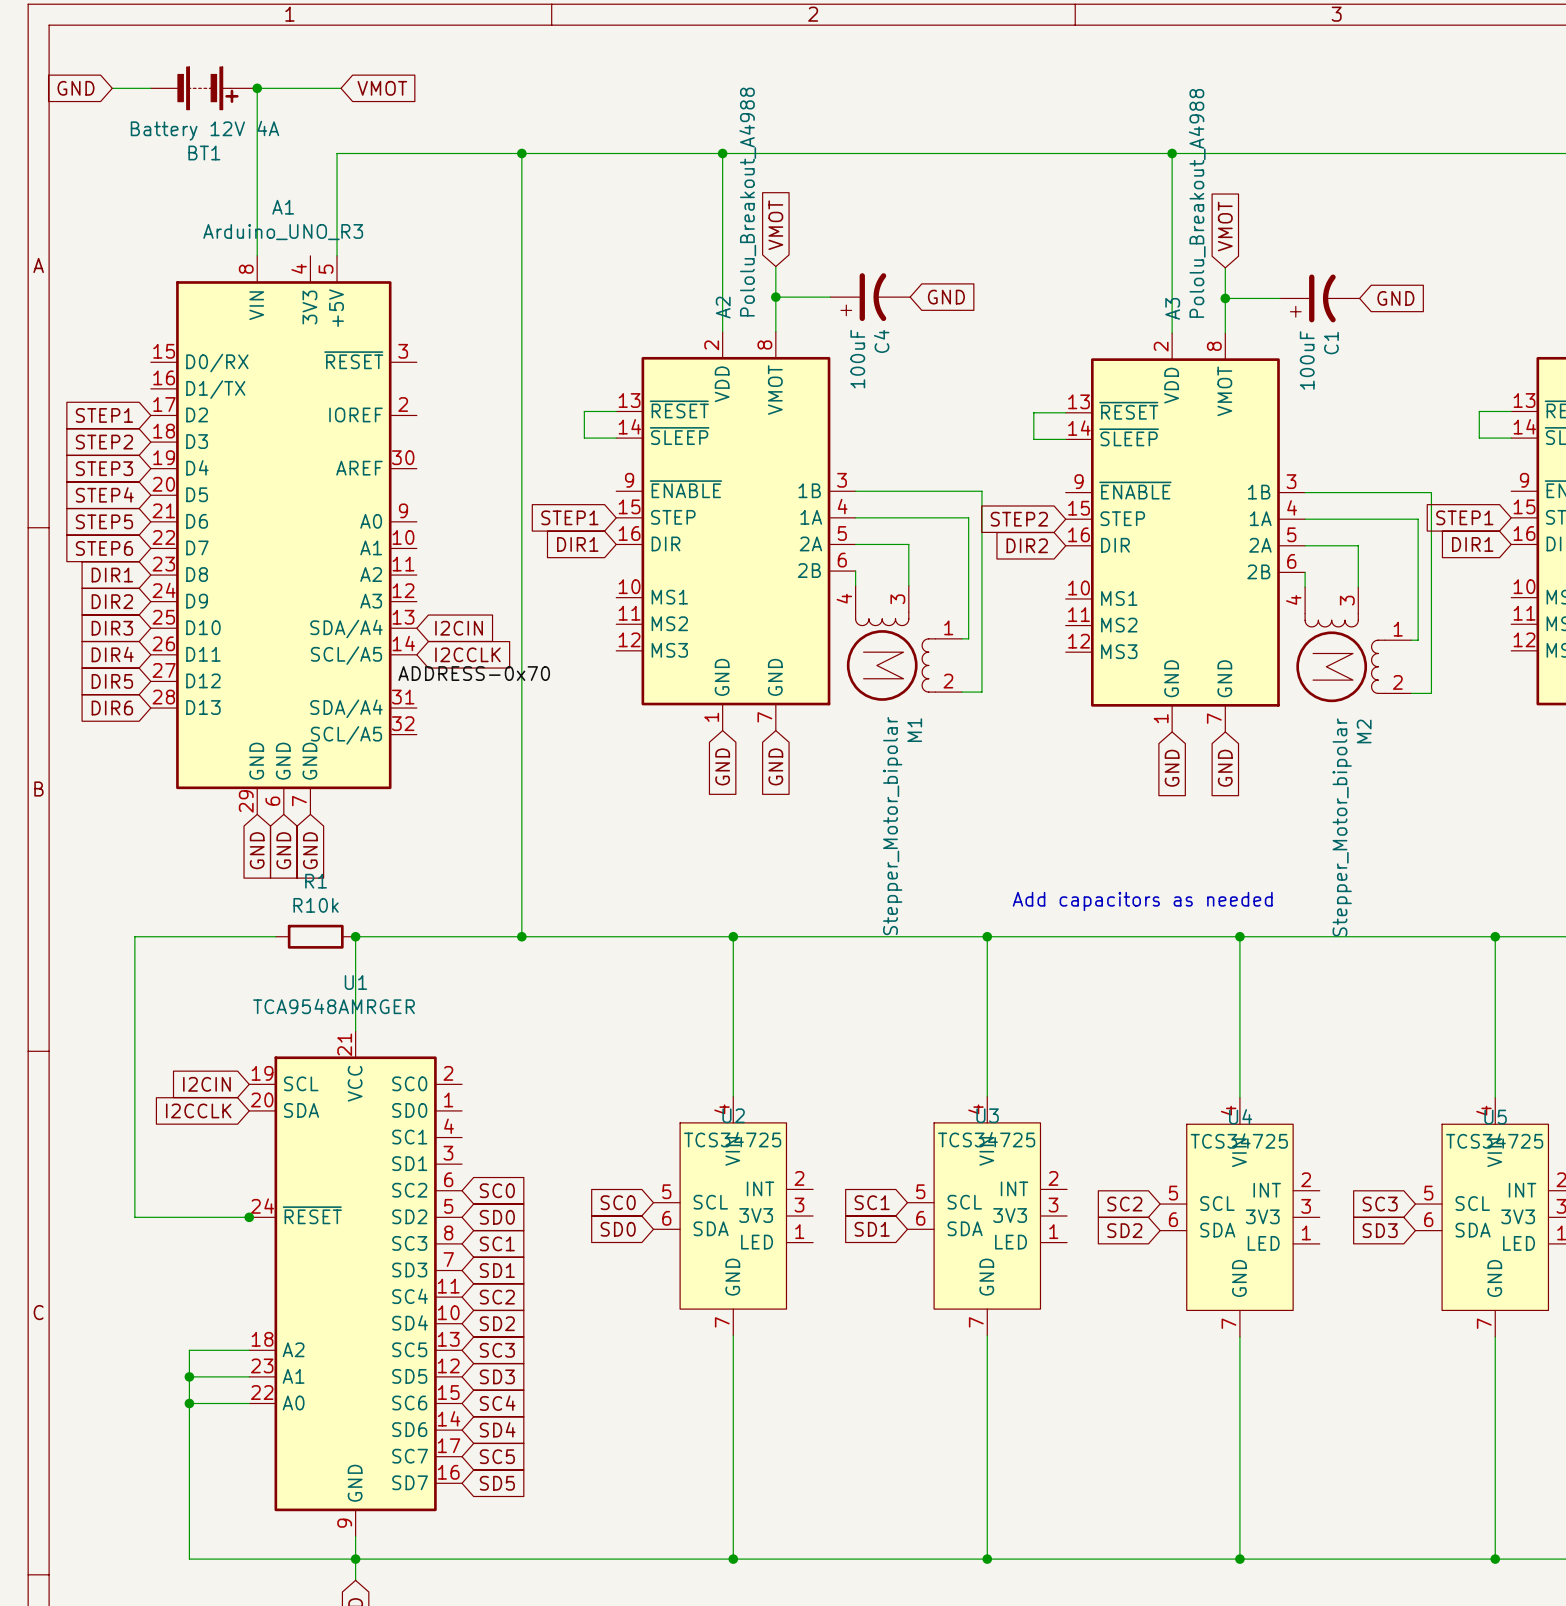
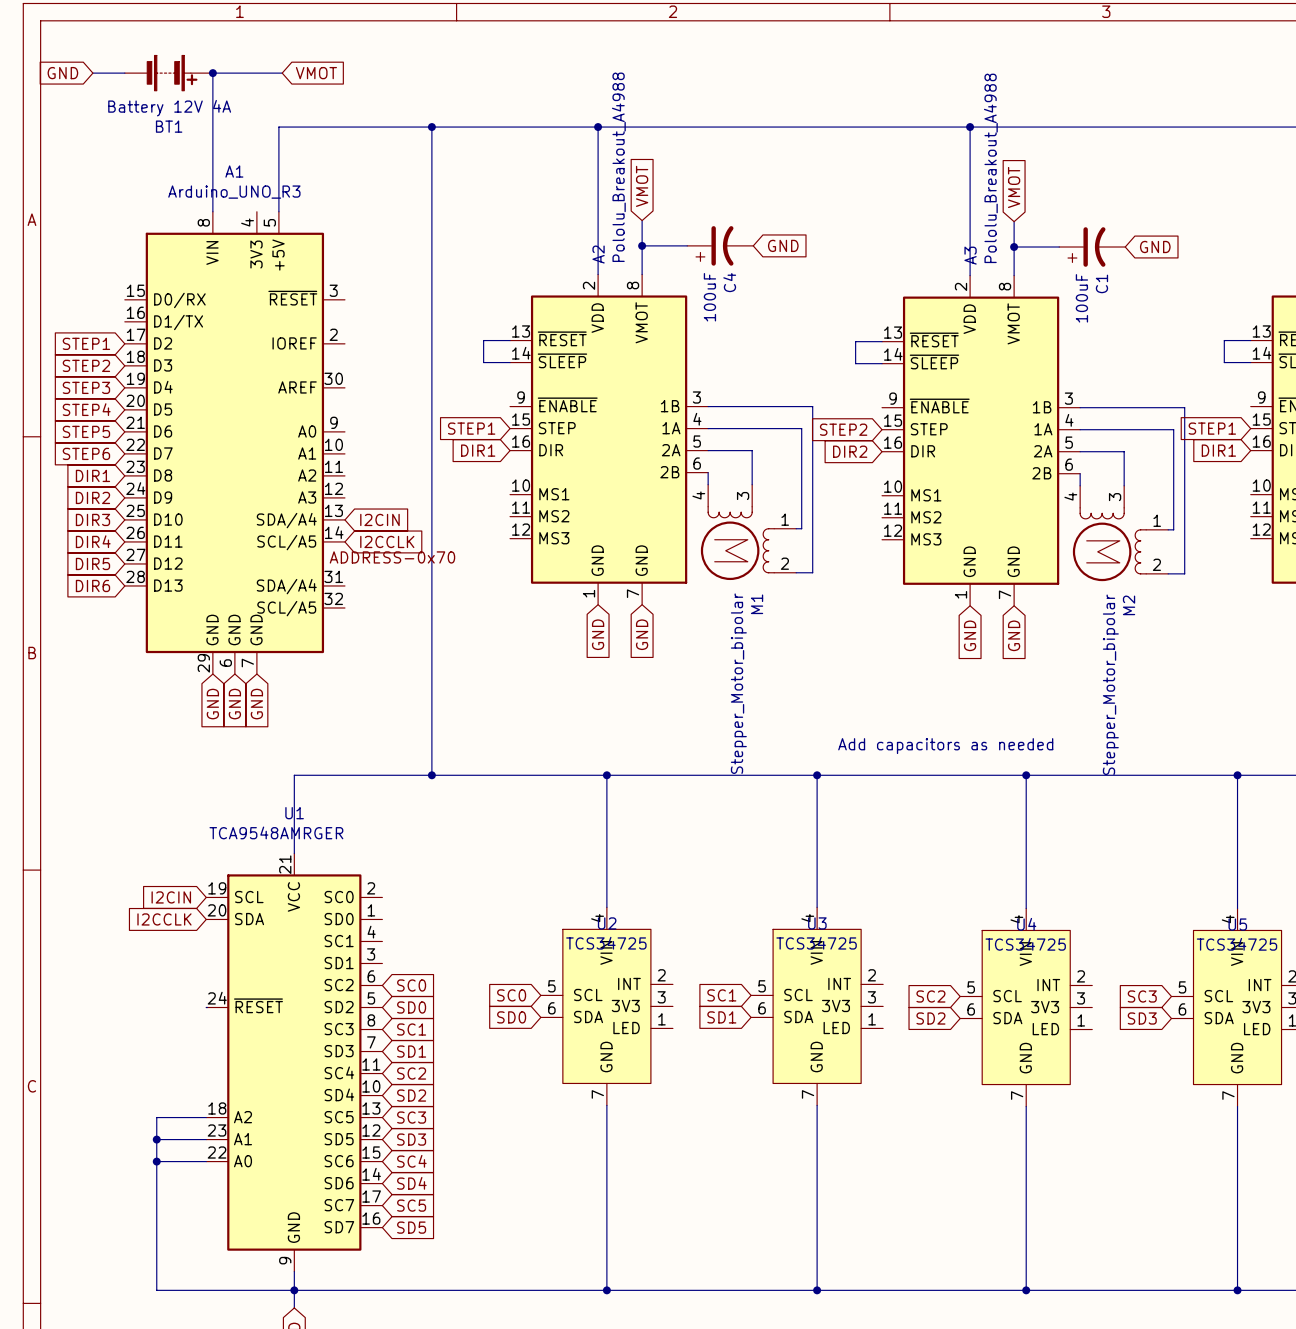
wire: (275, 936) (134, 936) (134, 1217) (249, 1217) -> none
R1: R10k (315, 936) -> none
junction: (355, 936) -> none
junction: (249, 1217) -> none

